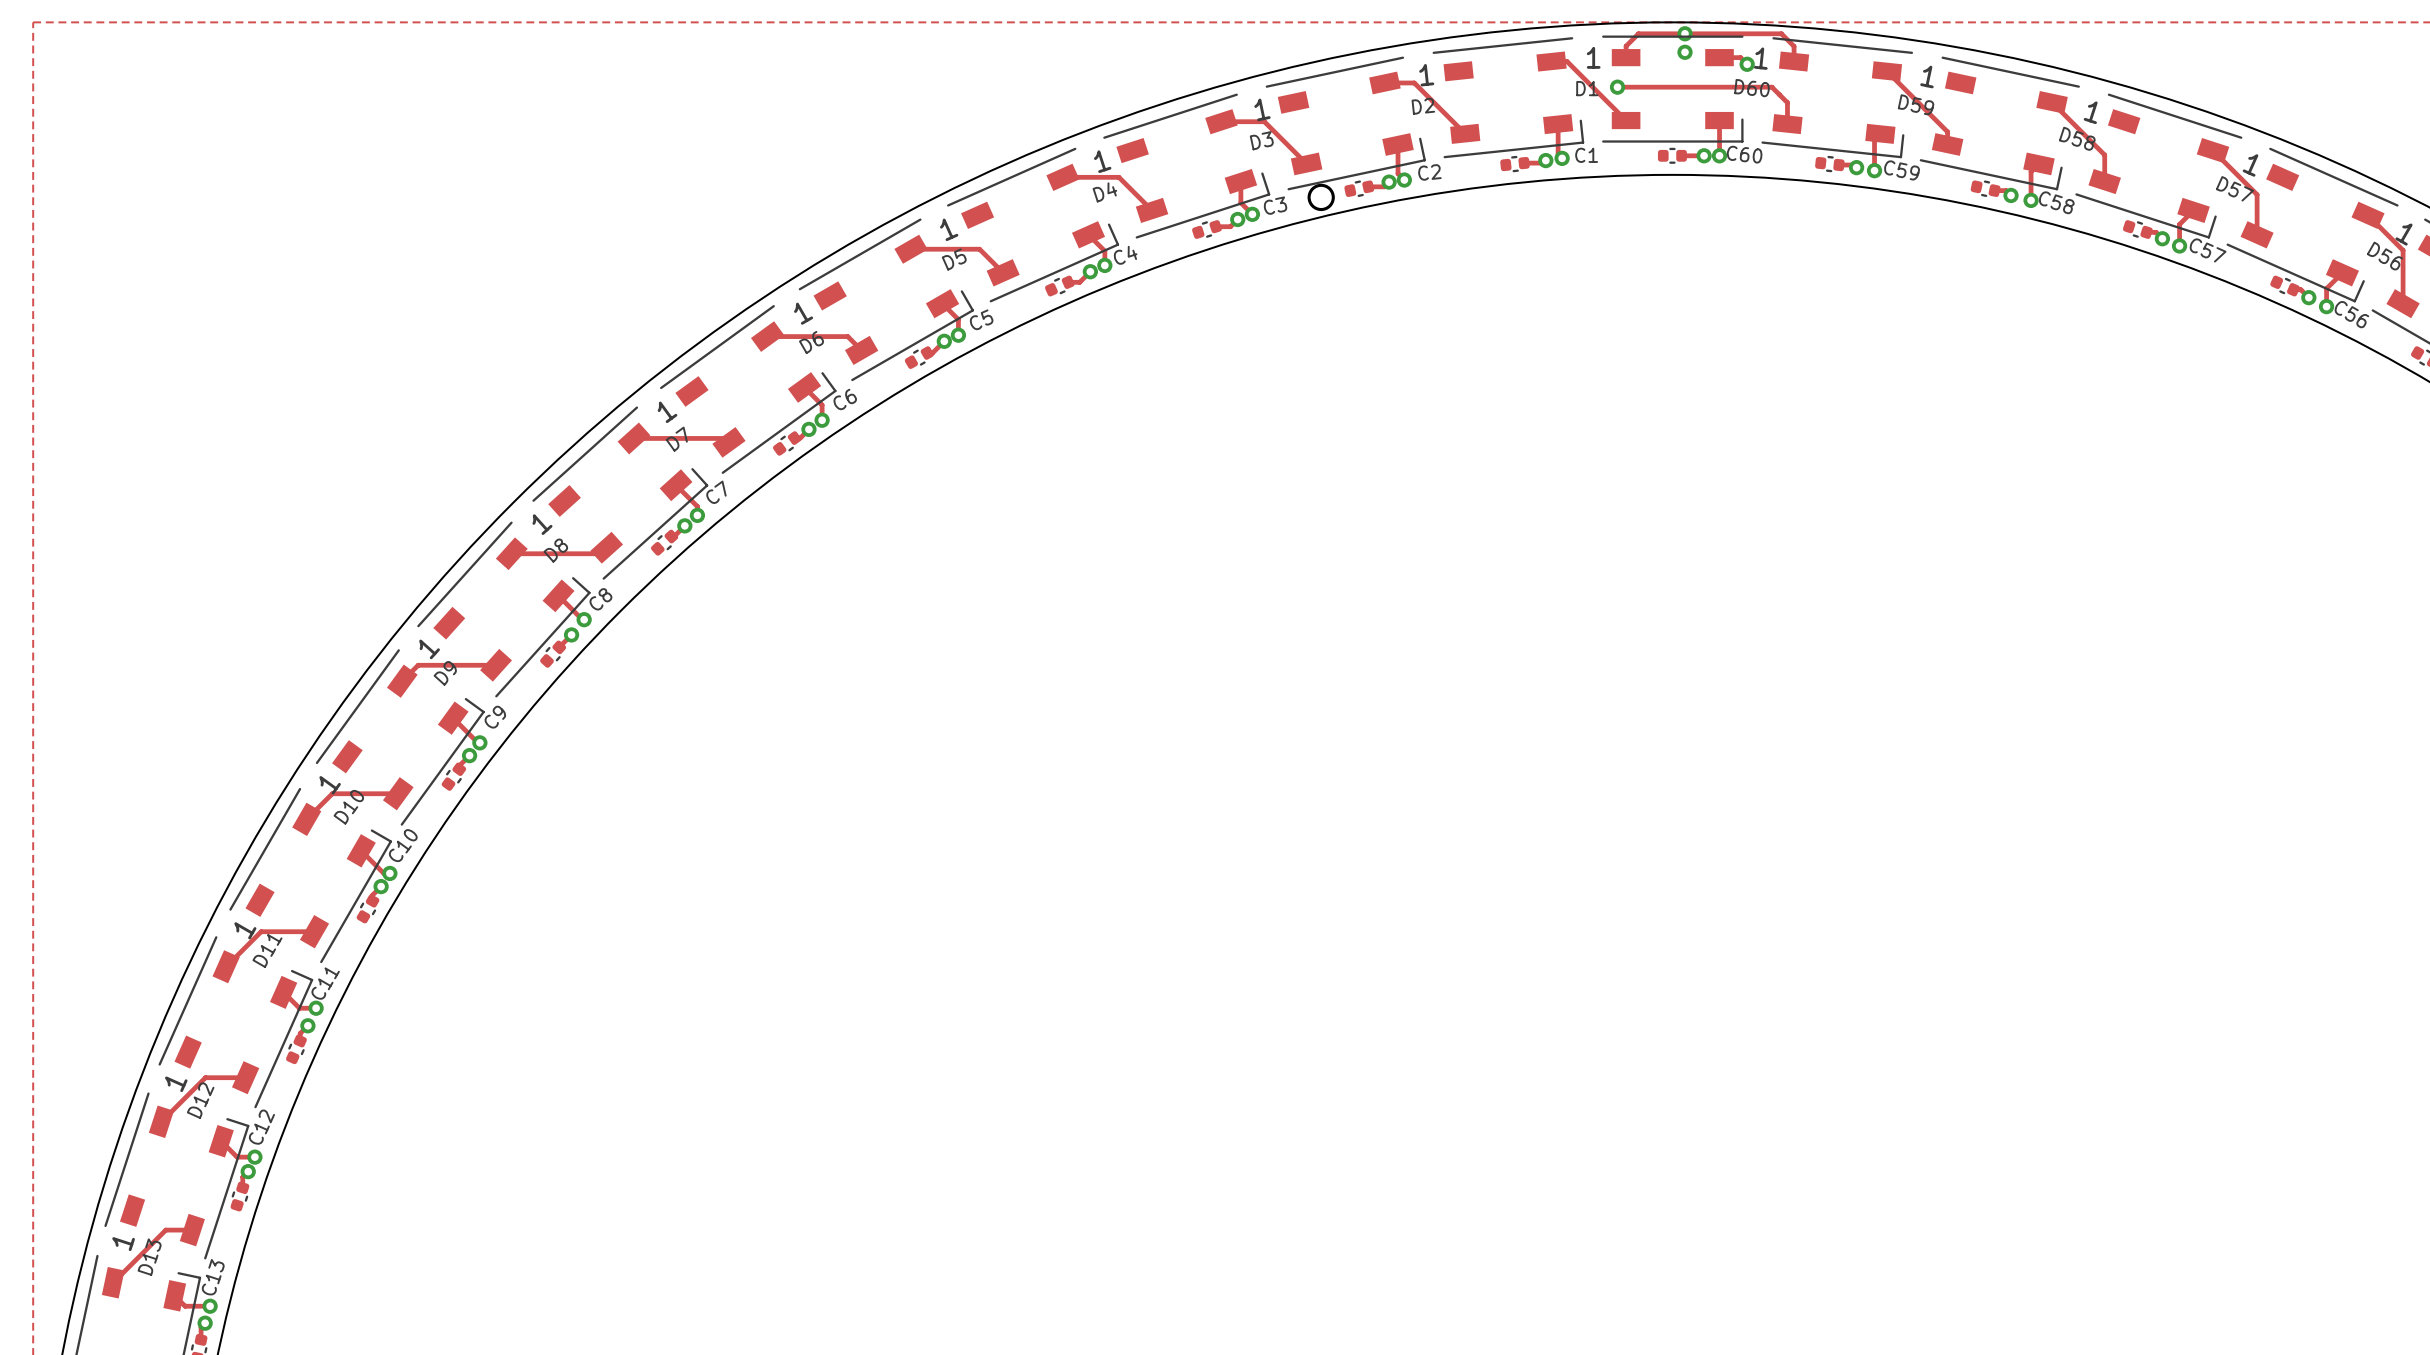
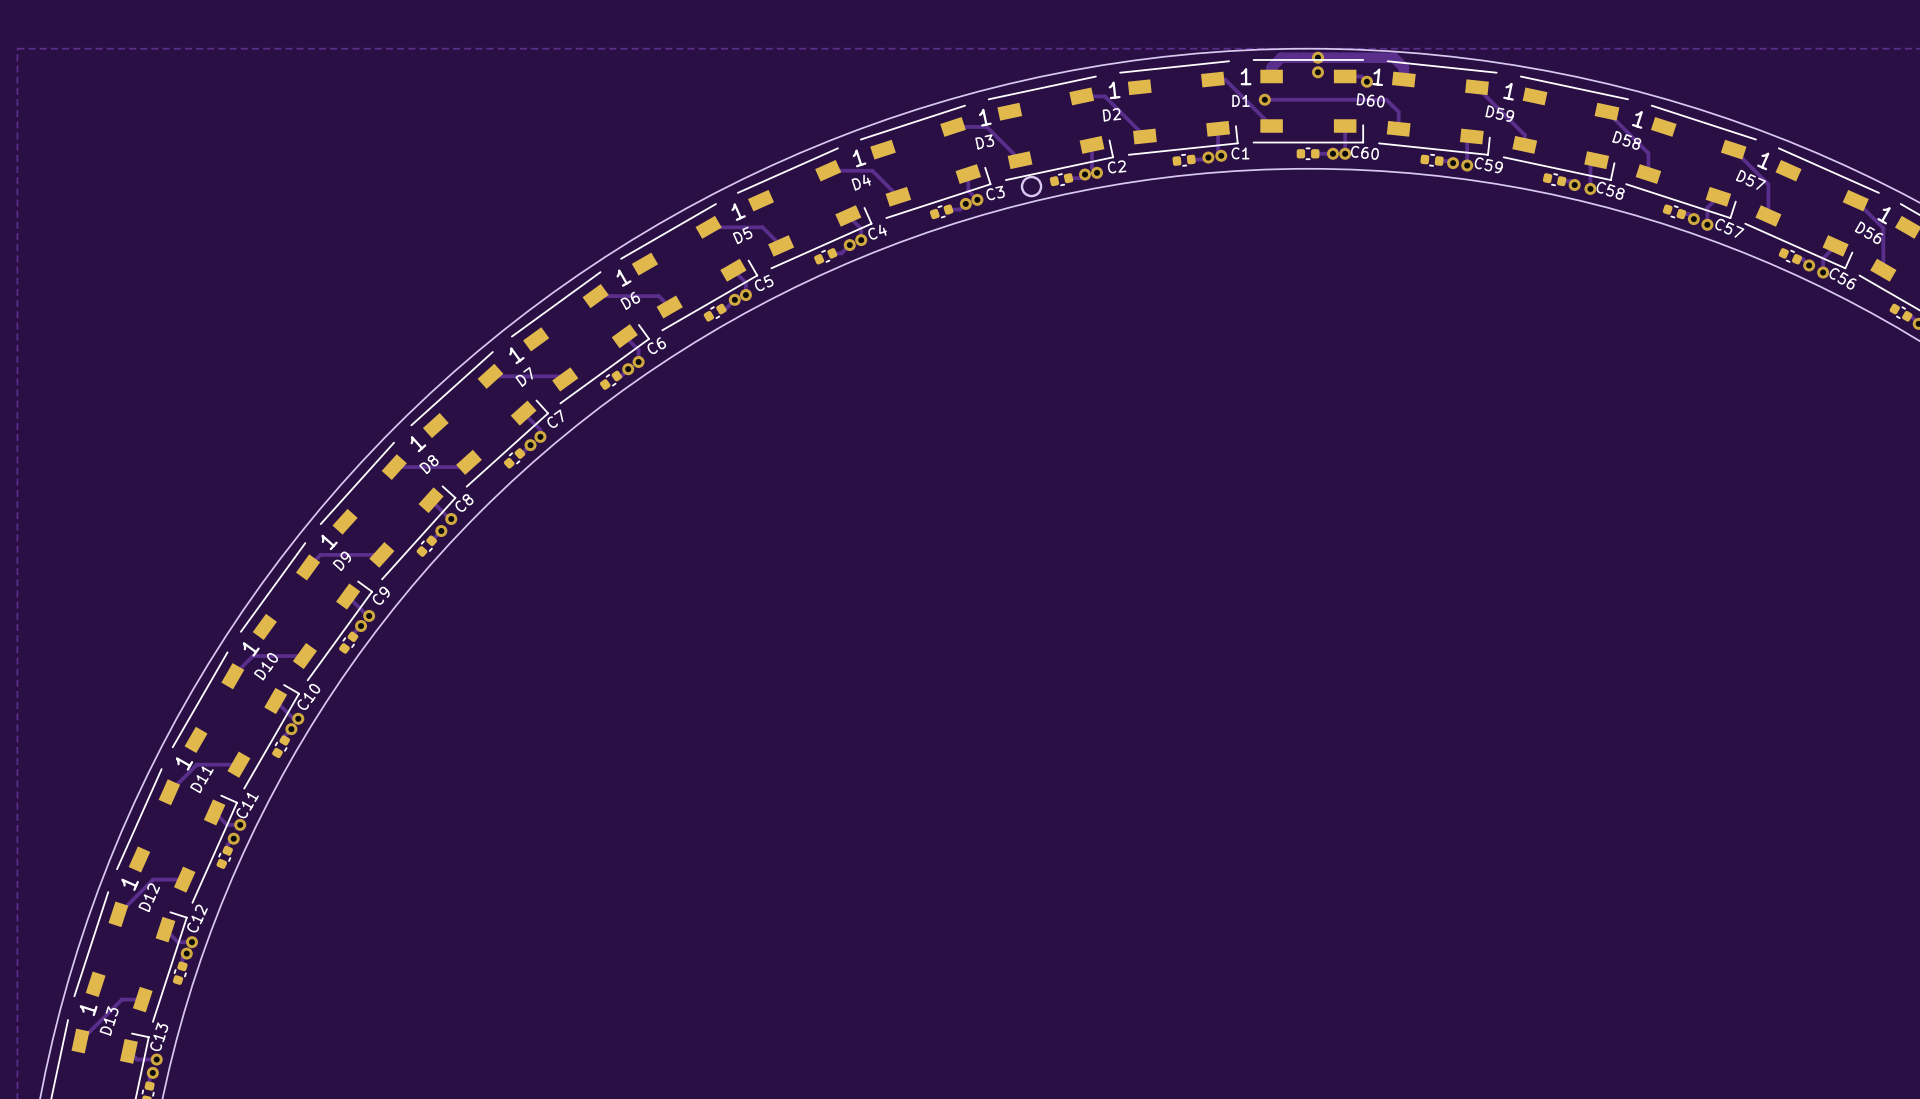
track width: thin (1626, 57) (1626, 46) (1638, 33) (1781, 33) (1794, 46) (1794, 61) -> thick (1271, 76) (1271, 67) (1281, 57) (1393, 57) (1403, 67) (1403, 79)

